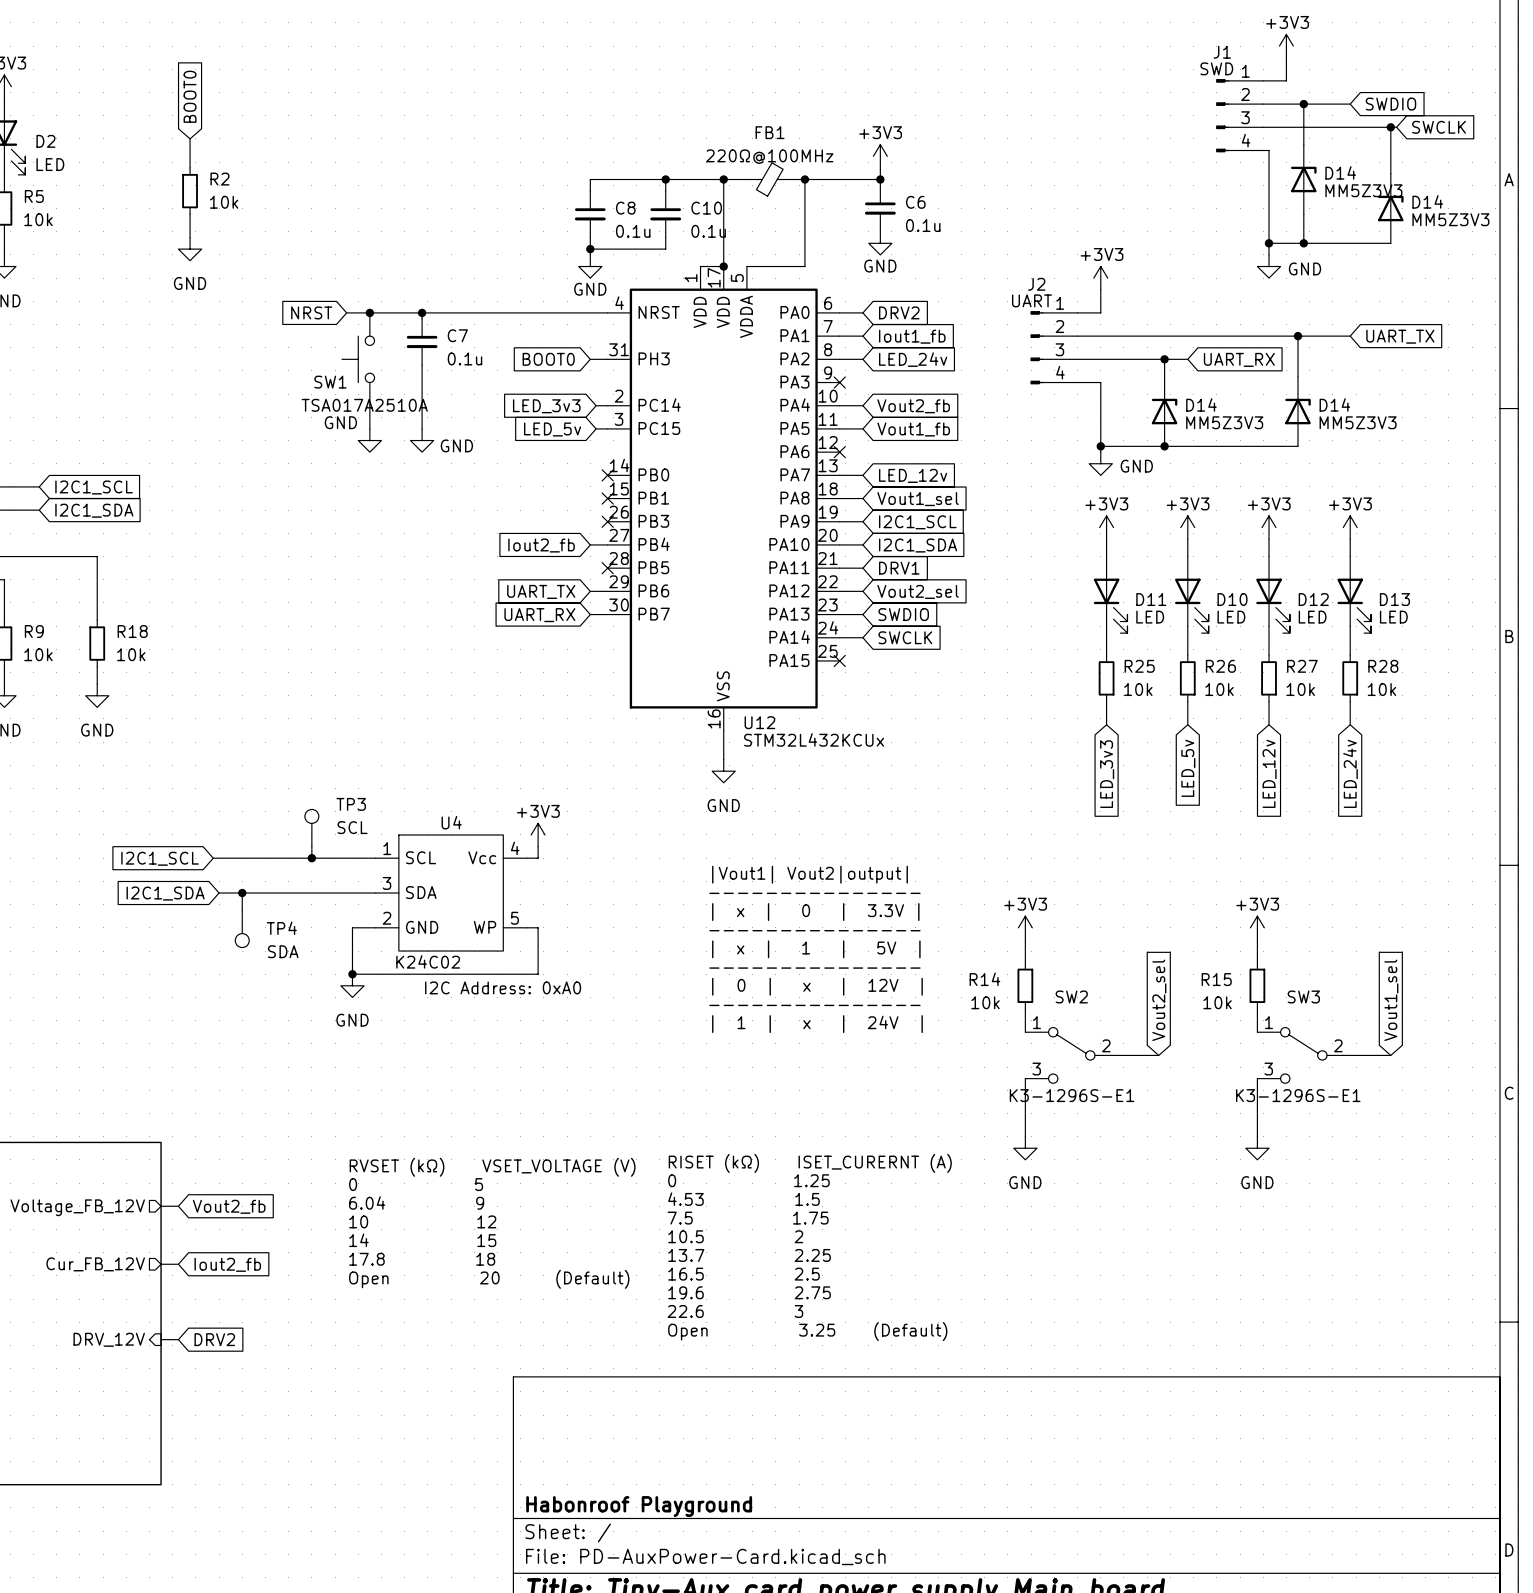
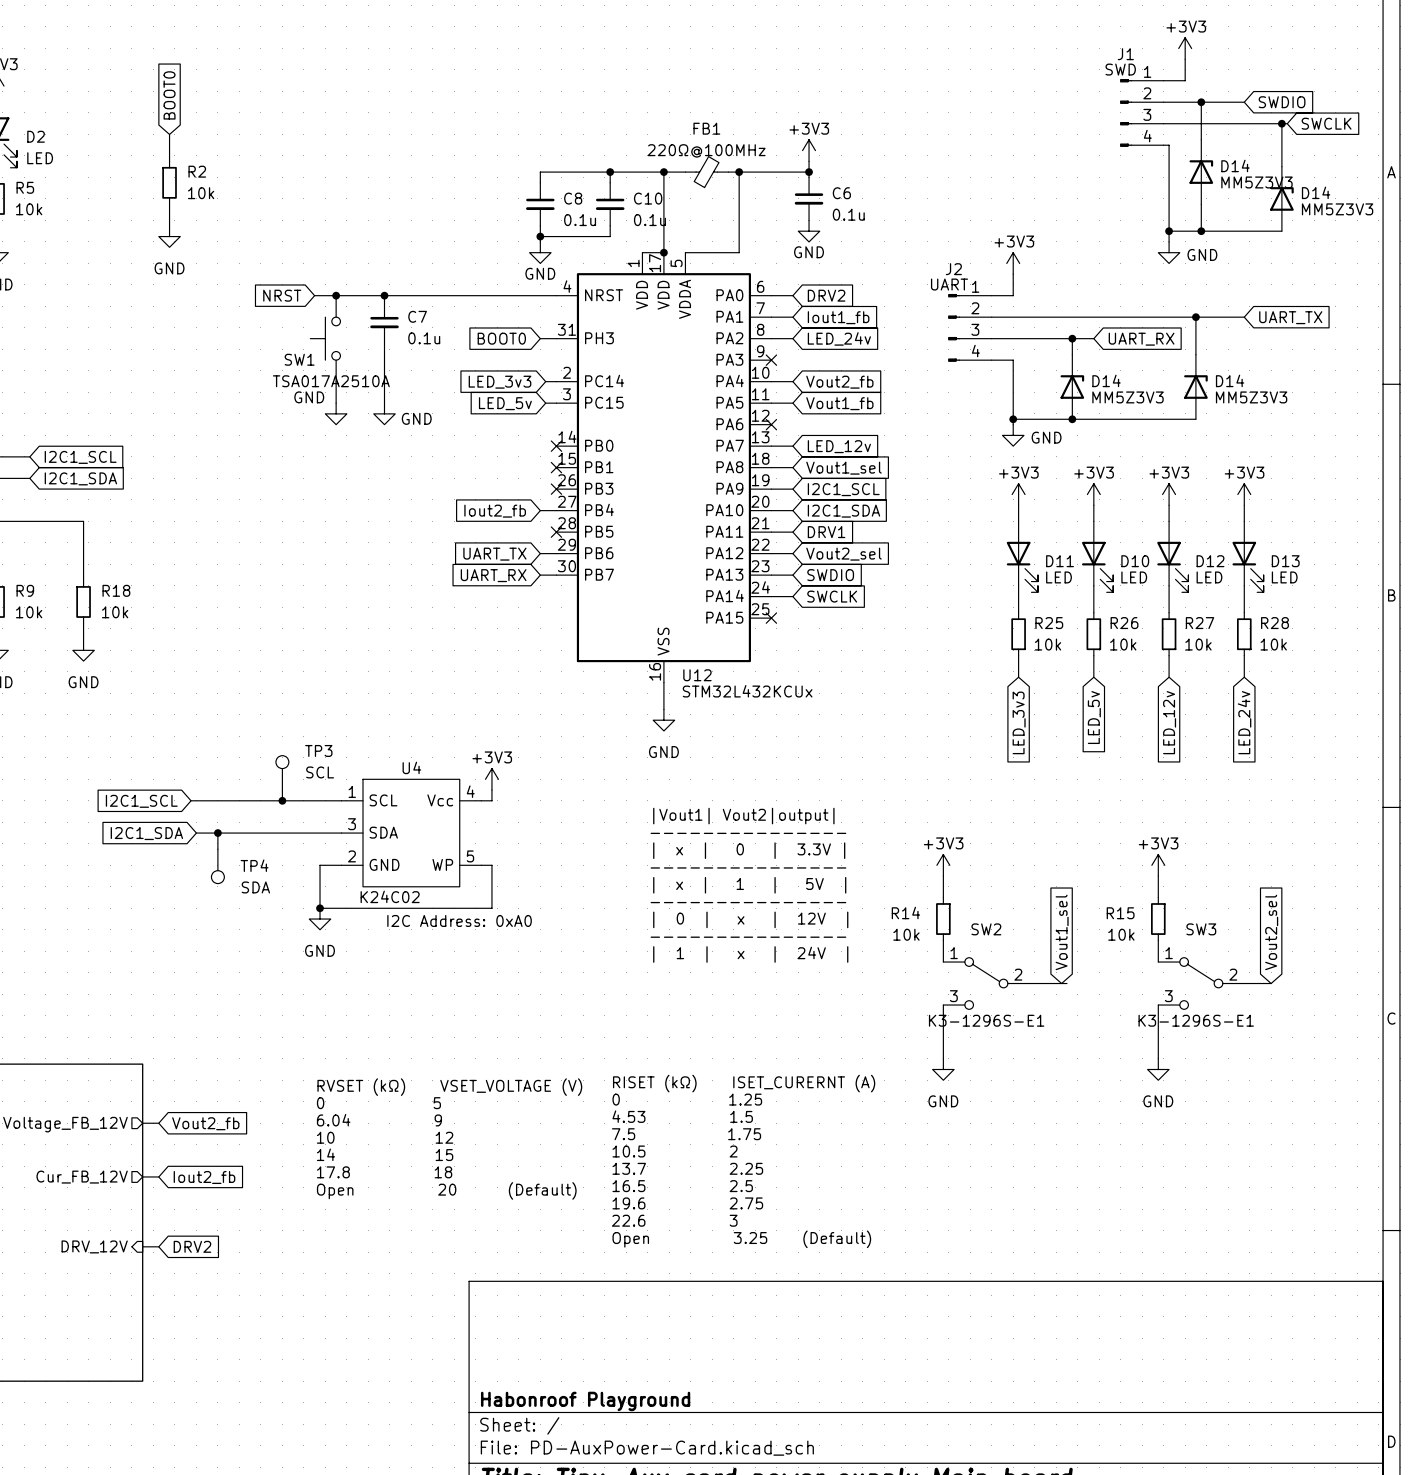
global label: Vout2_sel (1159, 1000) -> Vout1_sel (1062, 932)
global label: Vout1_sel (1391, 1000) -> Vout2_sel (1271, 932)
wire: (1379, 1055) (1390, 1055) -> none

